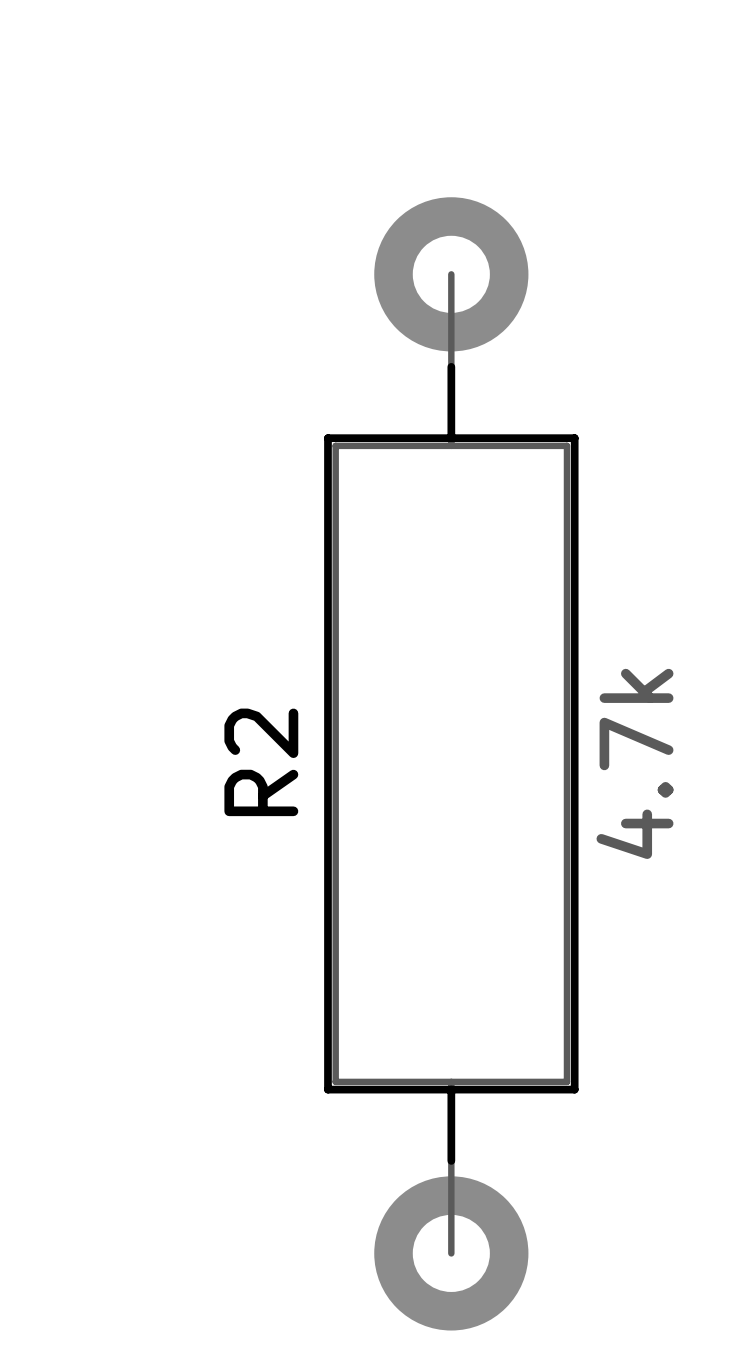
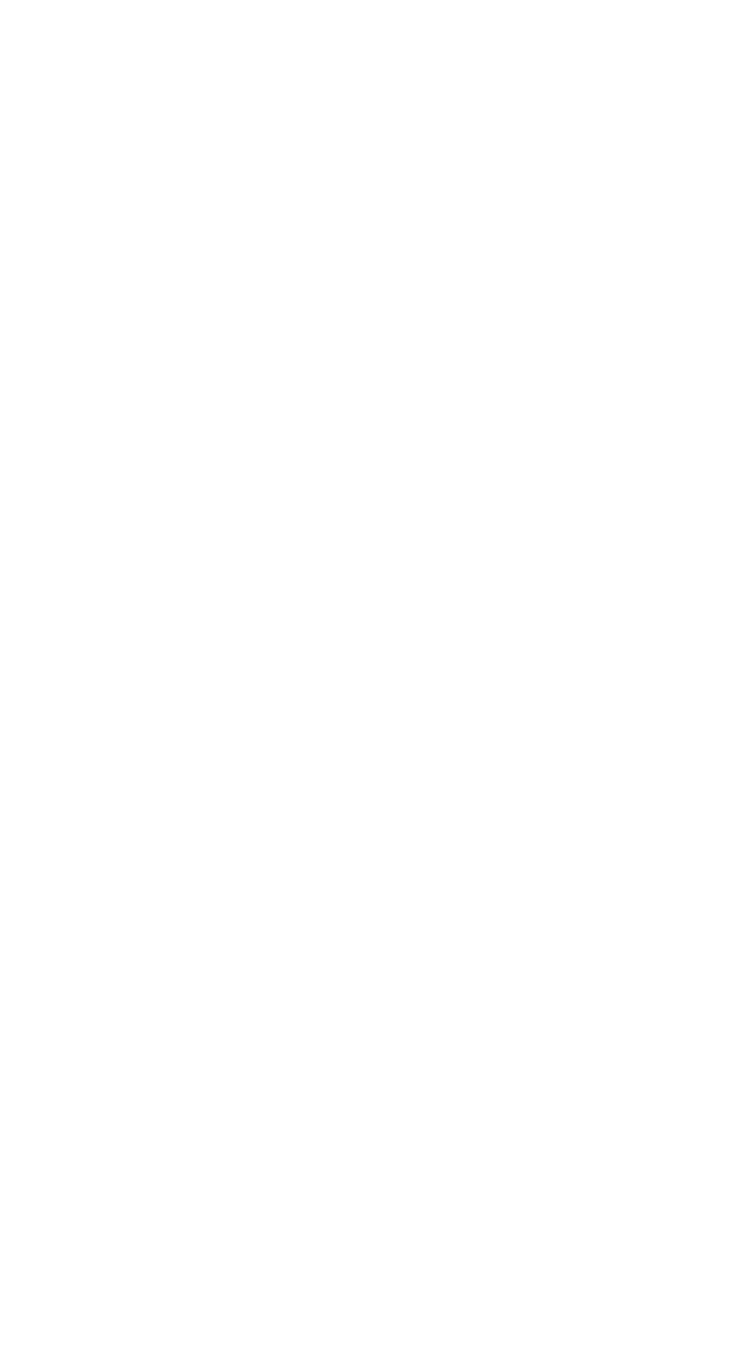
R2: 4.7k (451, 763) -> none

